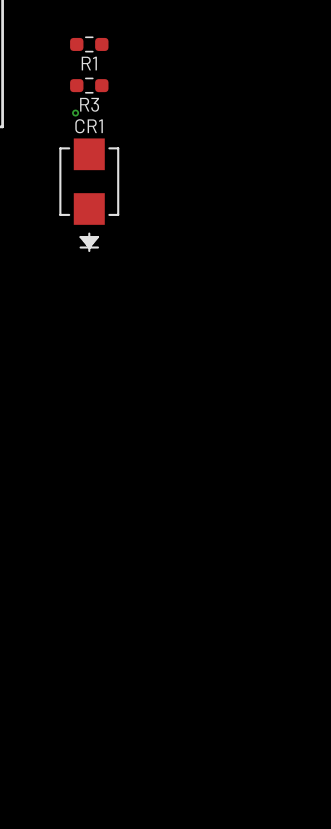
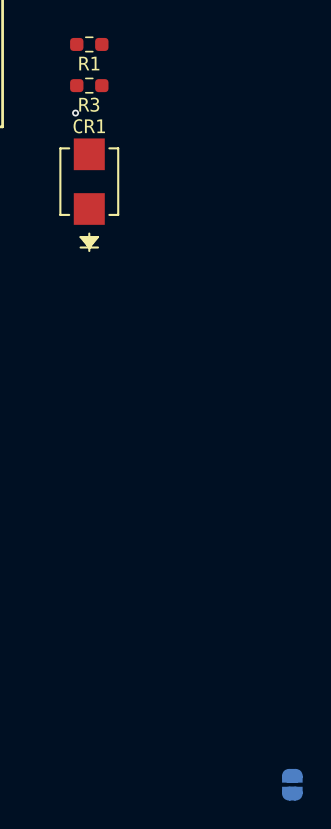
part: none -> (292, 784)

